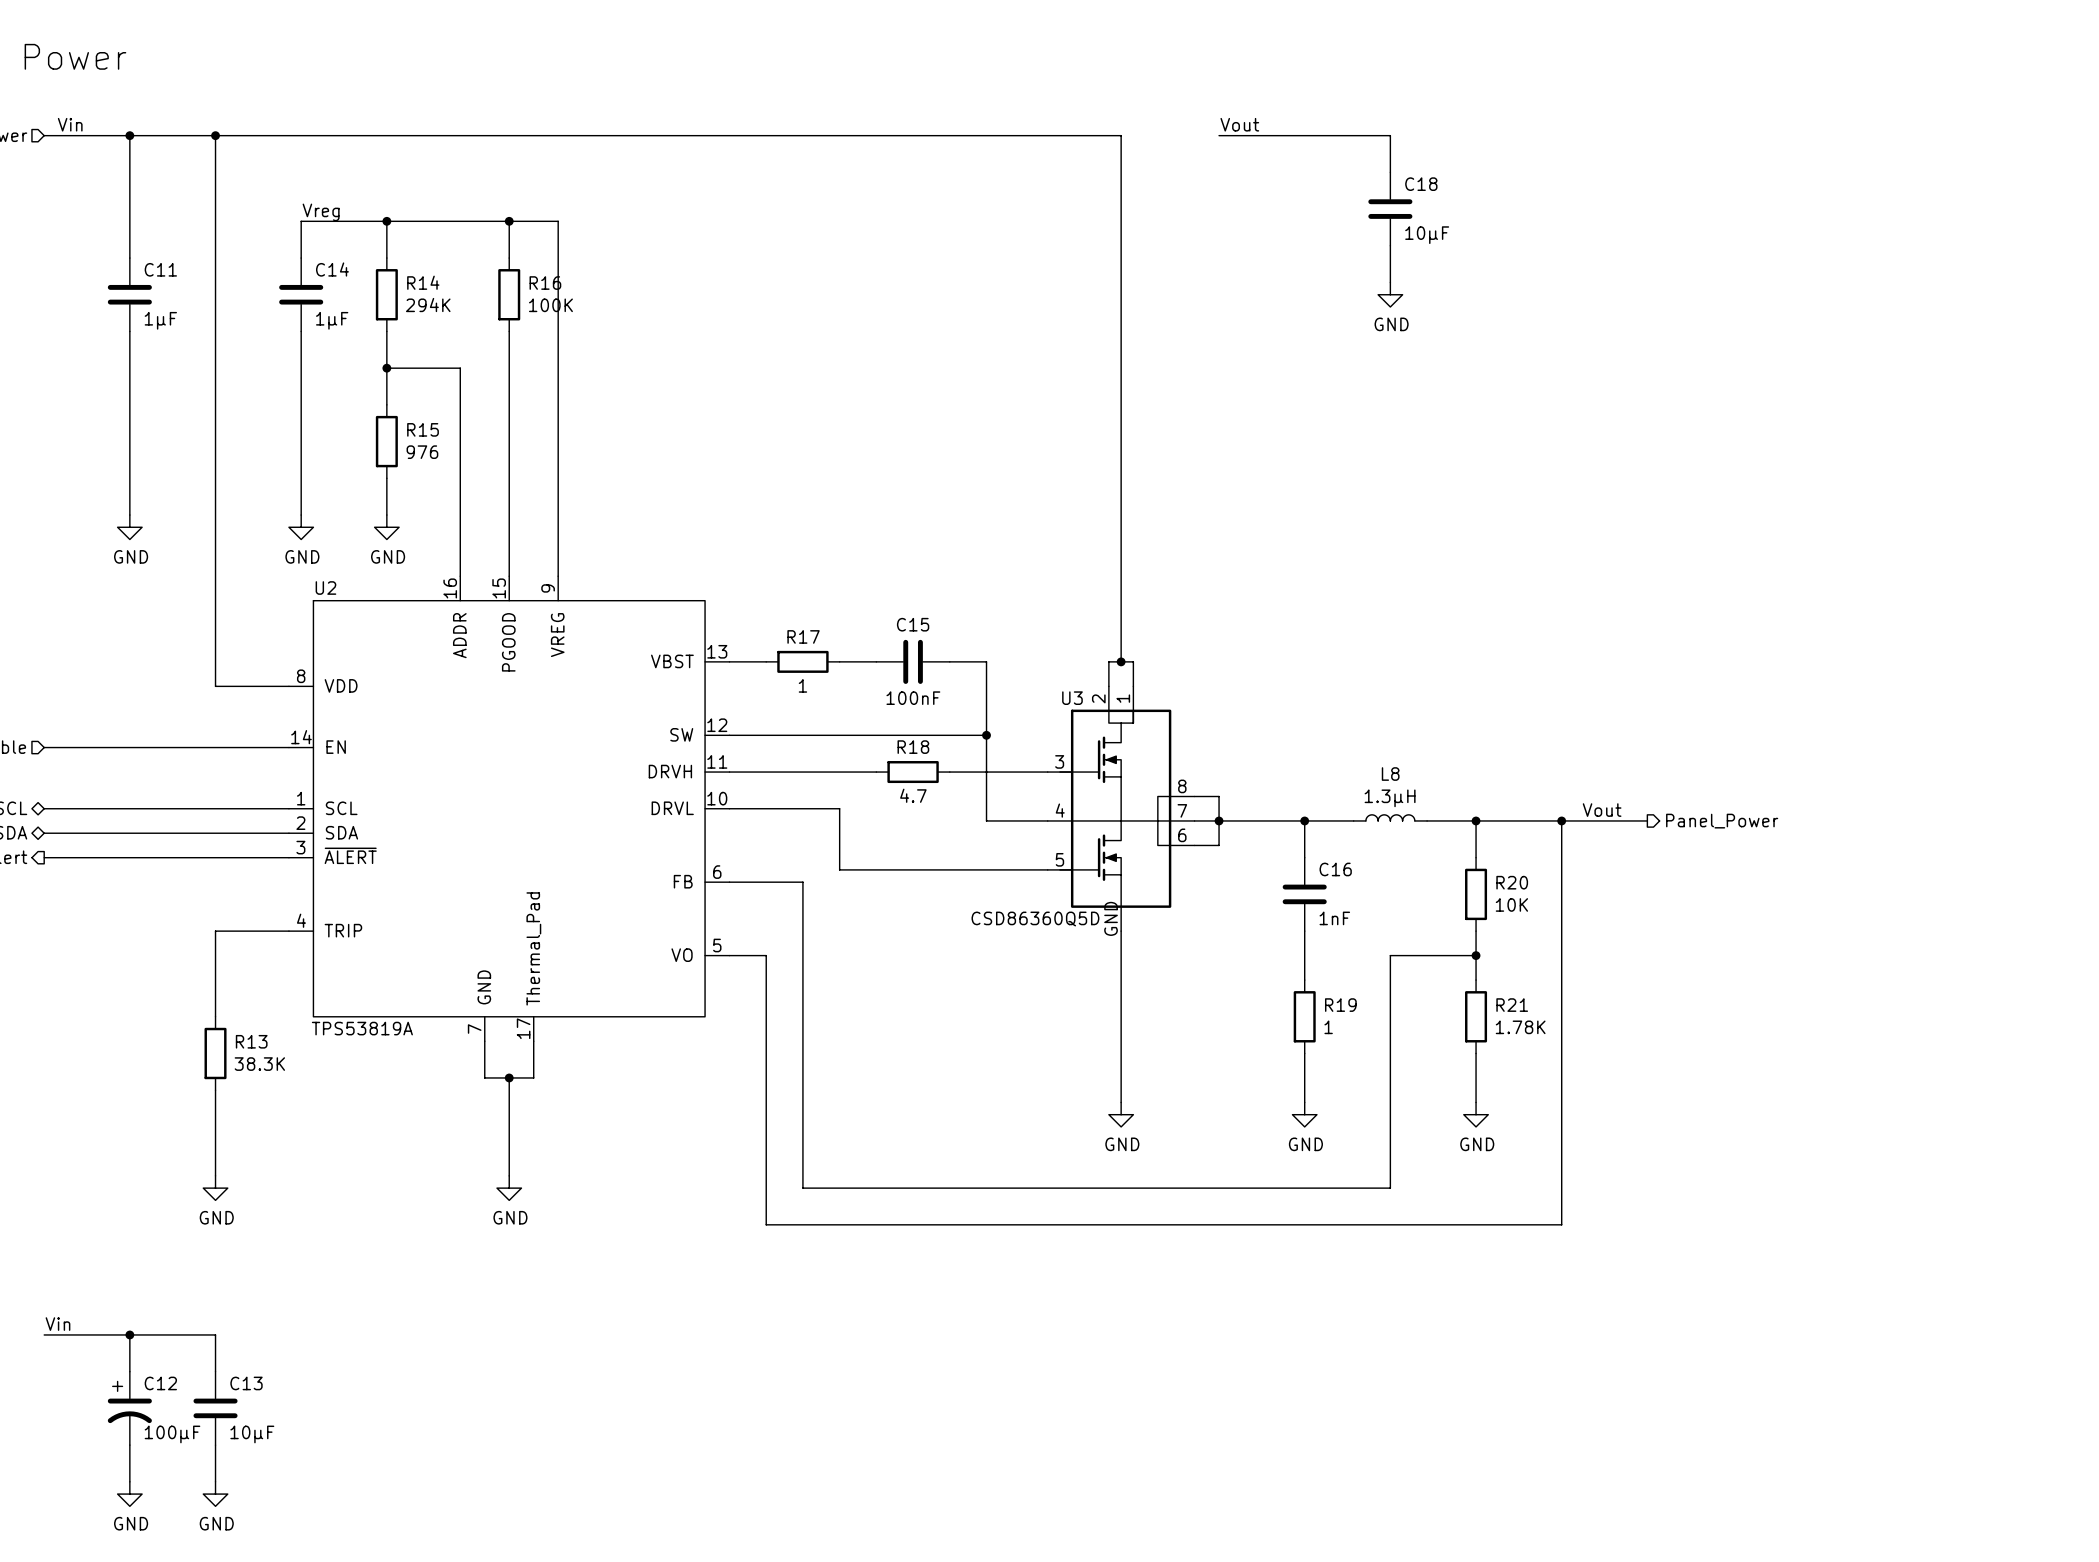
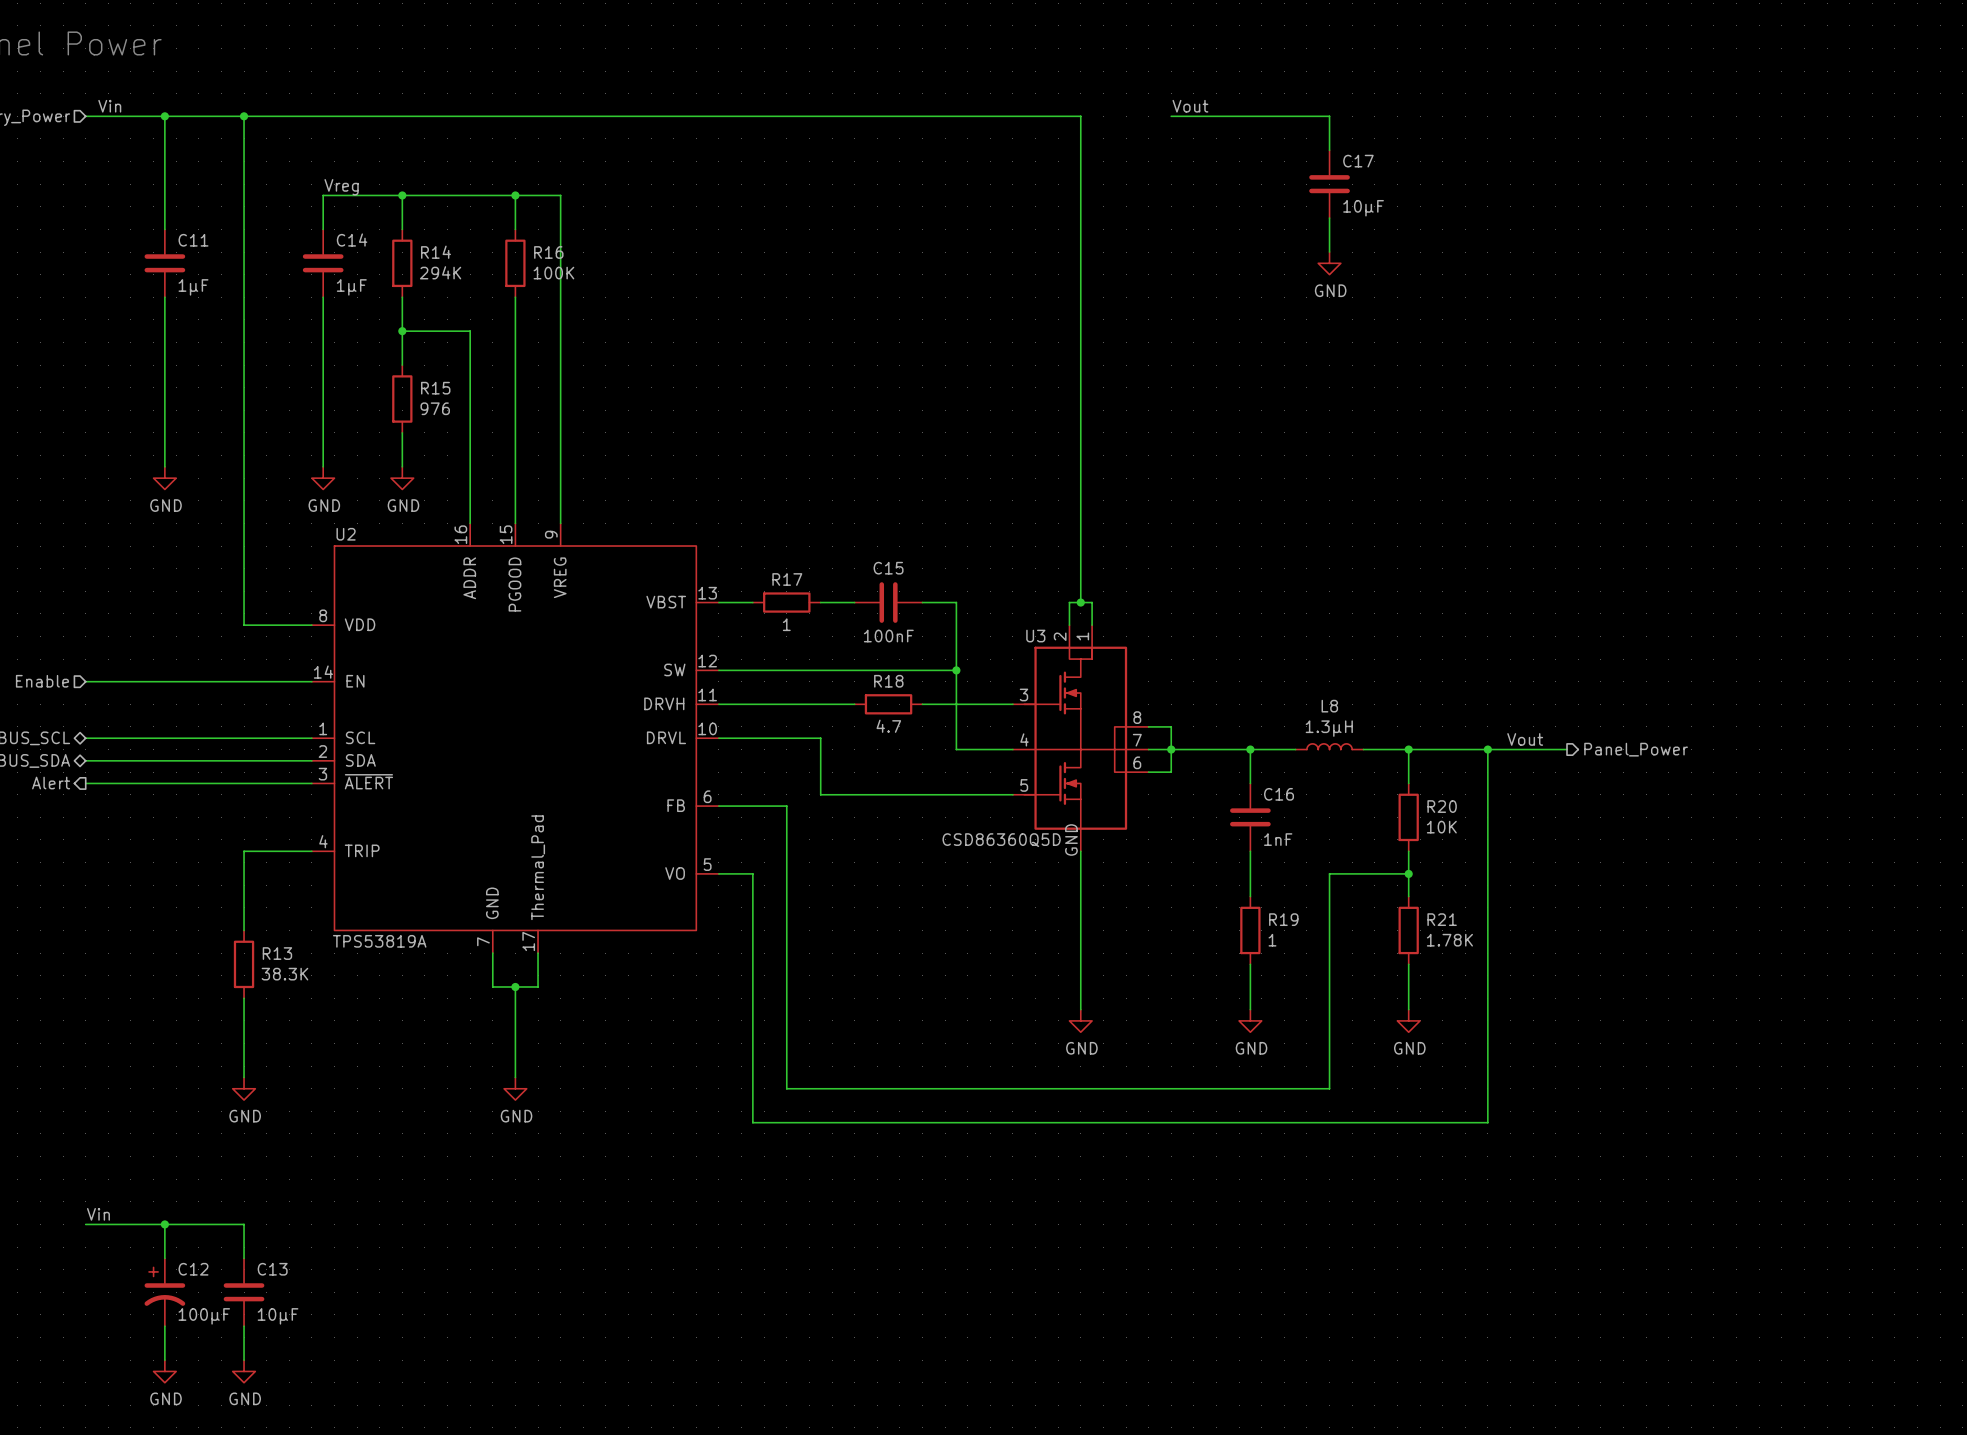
C18 name: C18 (1421, 184) -> C17 (1358, 161)

